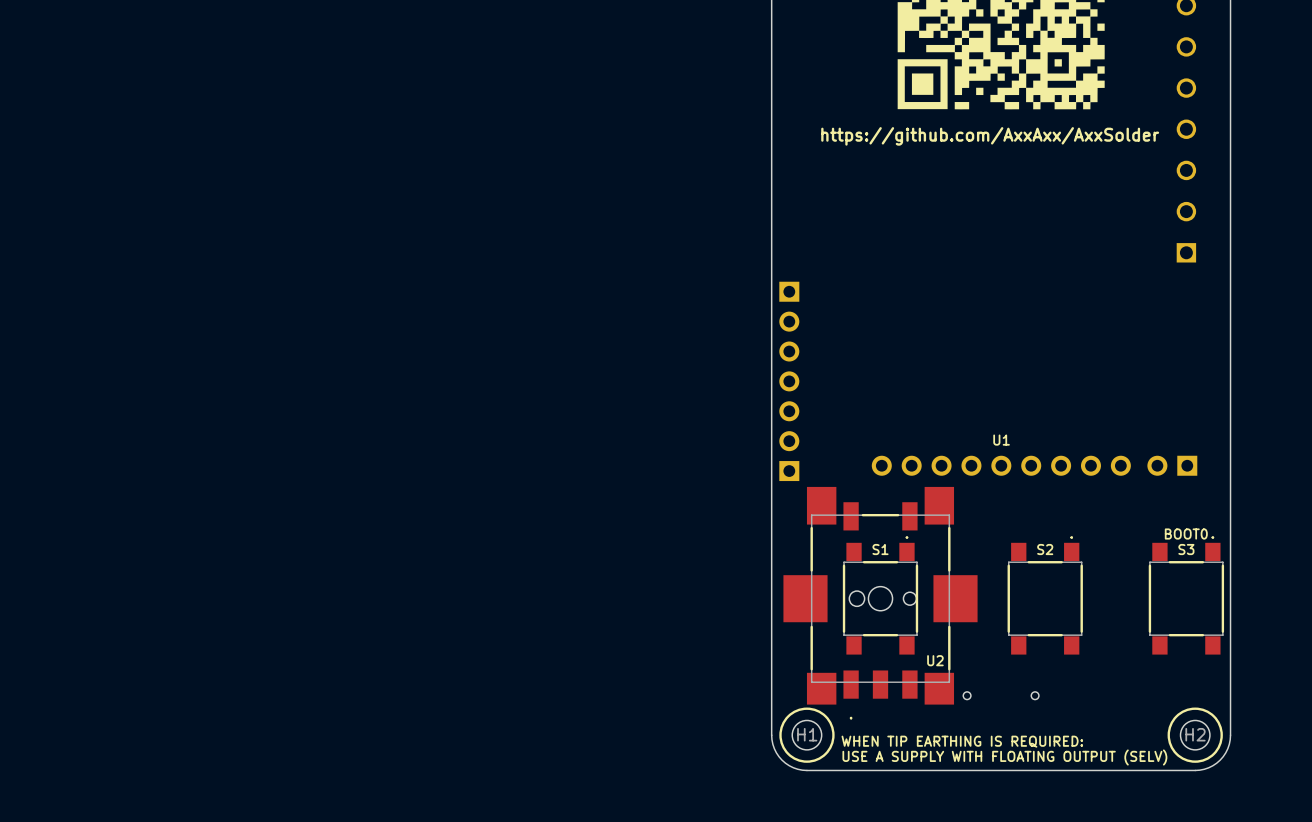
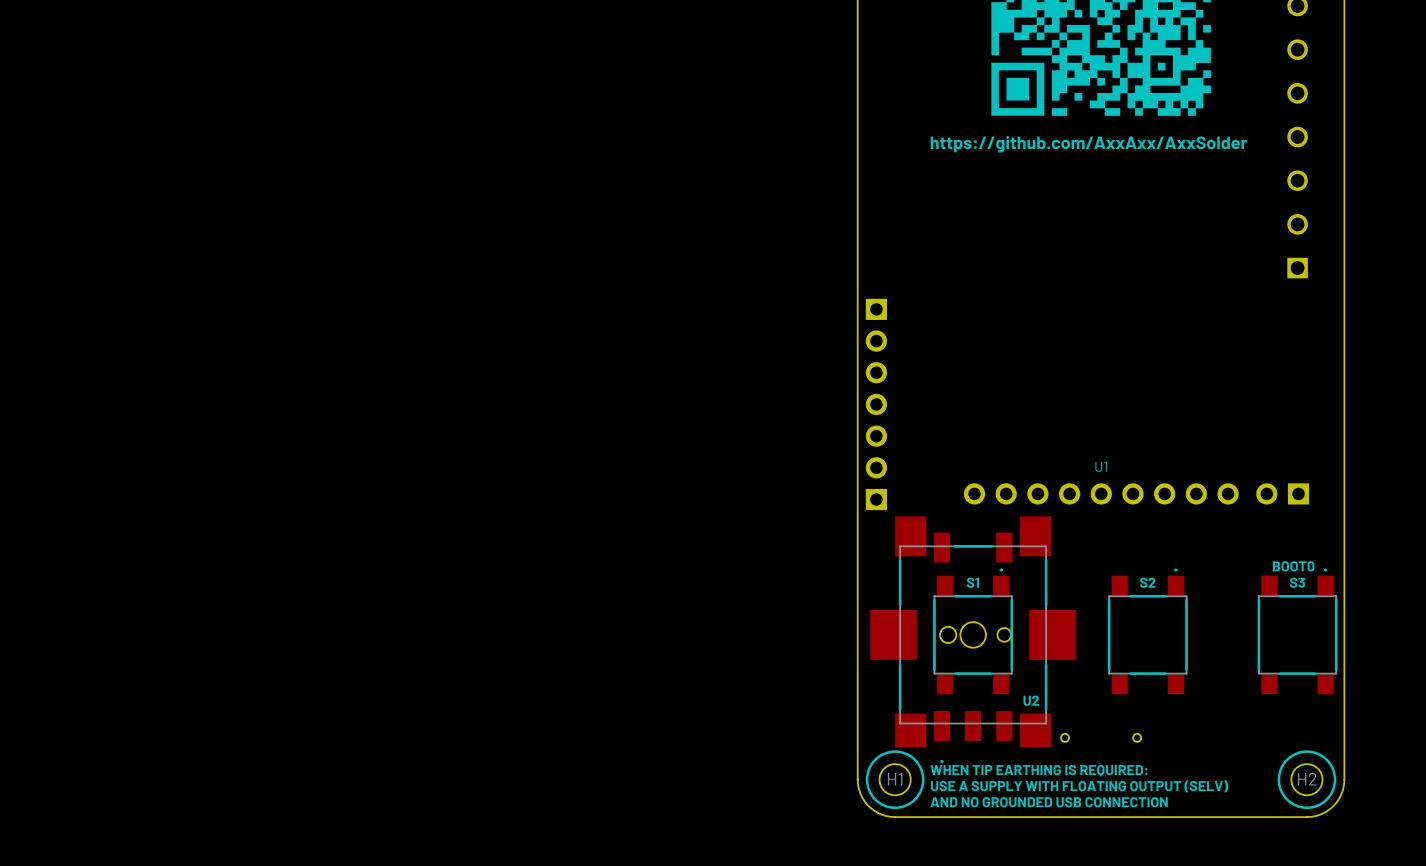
text: none -> WHEN TIP EARTHING IS REQUIRED: (1038, 770)
text: WHEN TIP EARTHING IS REQUIRED: (962, 741) -> USE A SUPPLY WITH FLOATING OUTPUT (SELV) (1079, 786)
text: USE A SUPPLY WITH FLOATING OUTPUT (SELV) (1004, 757) -> AND NO GROUNDED USB CONNECTION (1049, 802)

